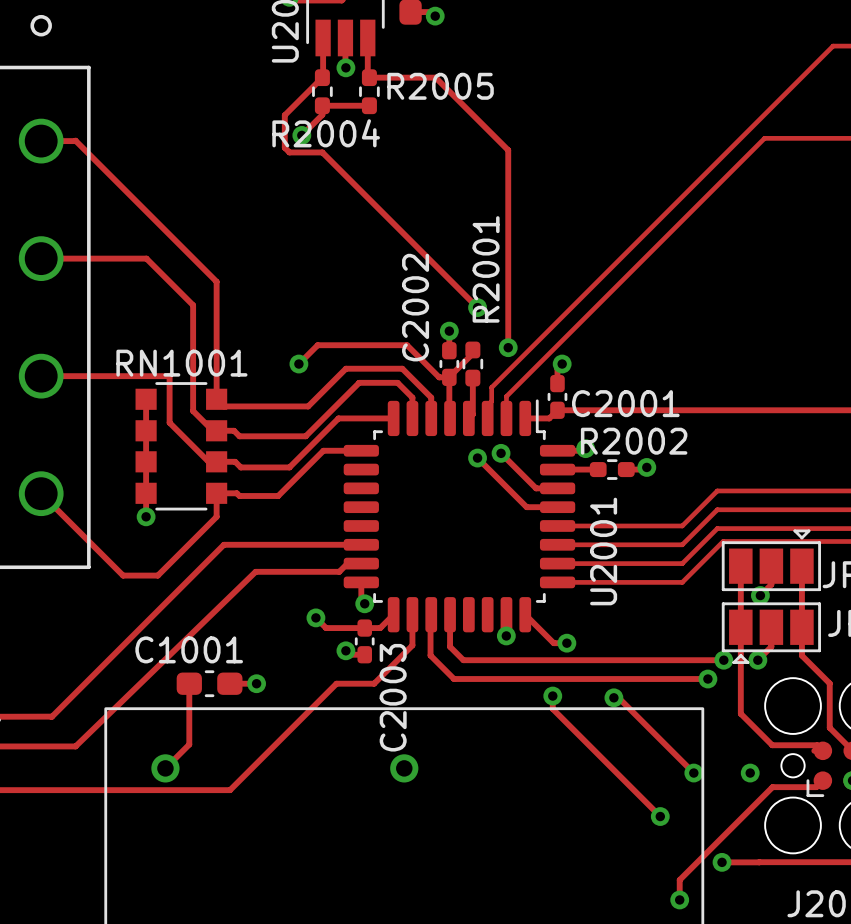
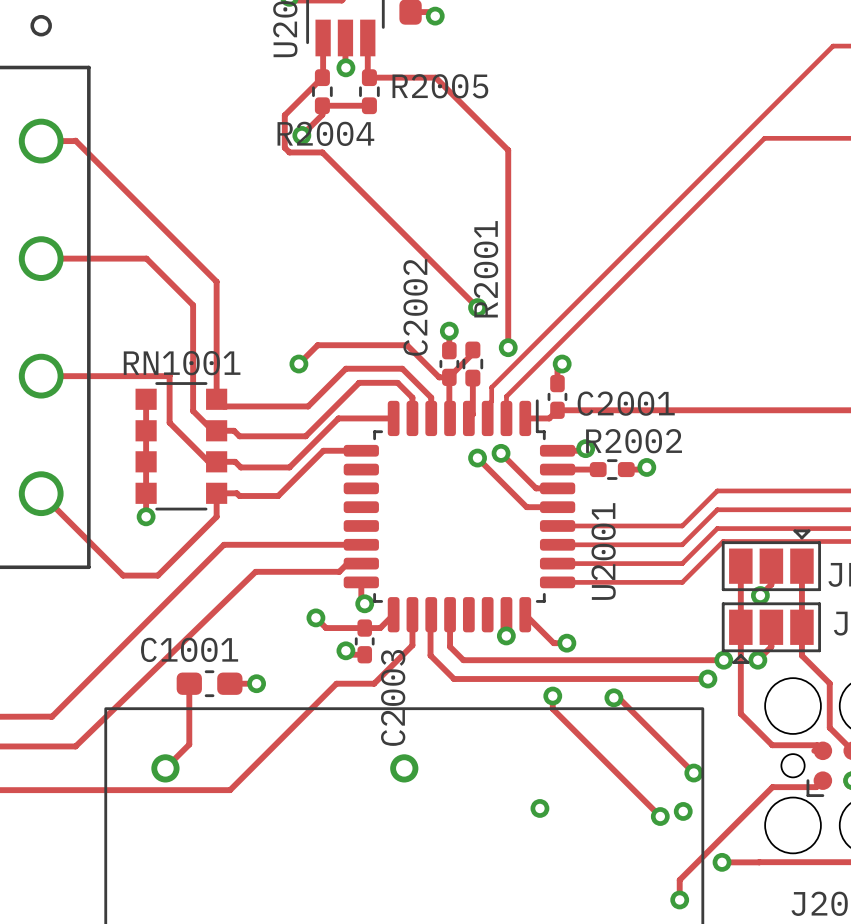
via position: (750, 773) -> (683, 811)
via: none -> (539, 808)

